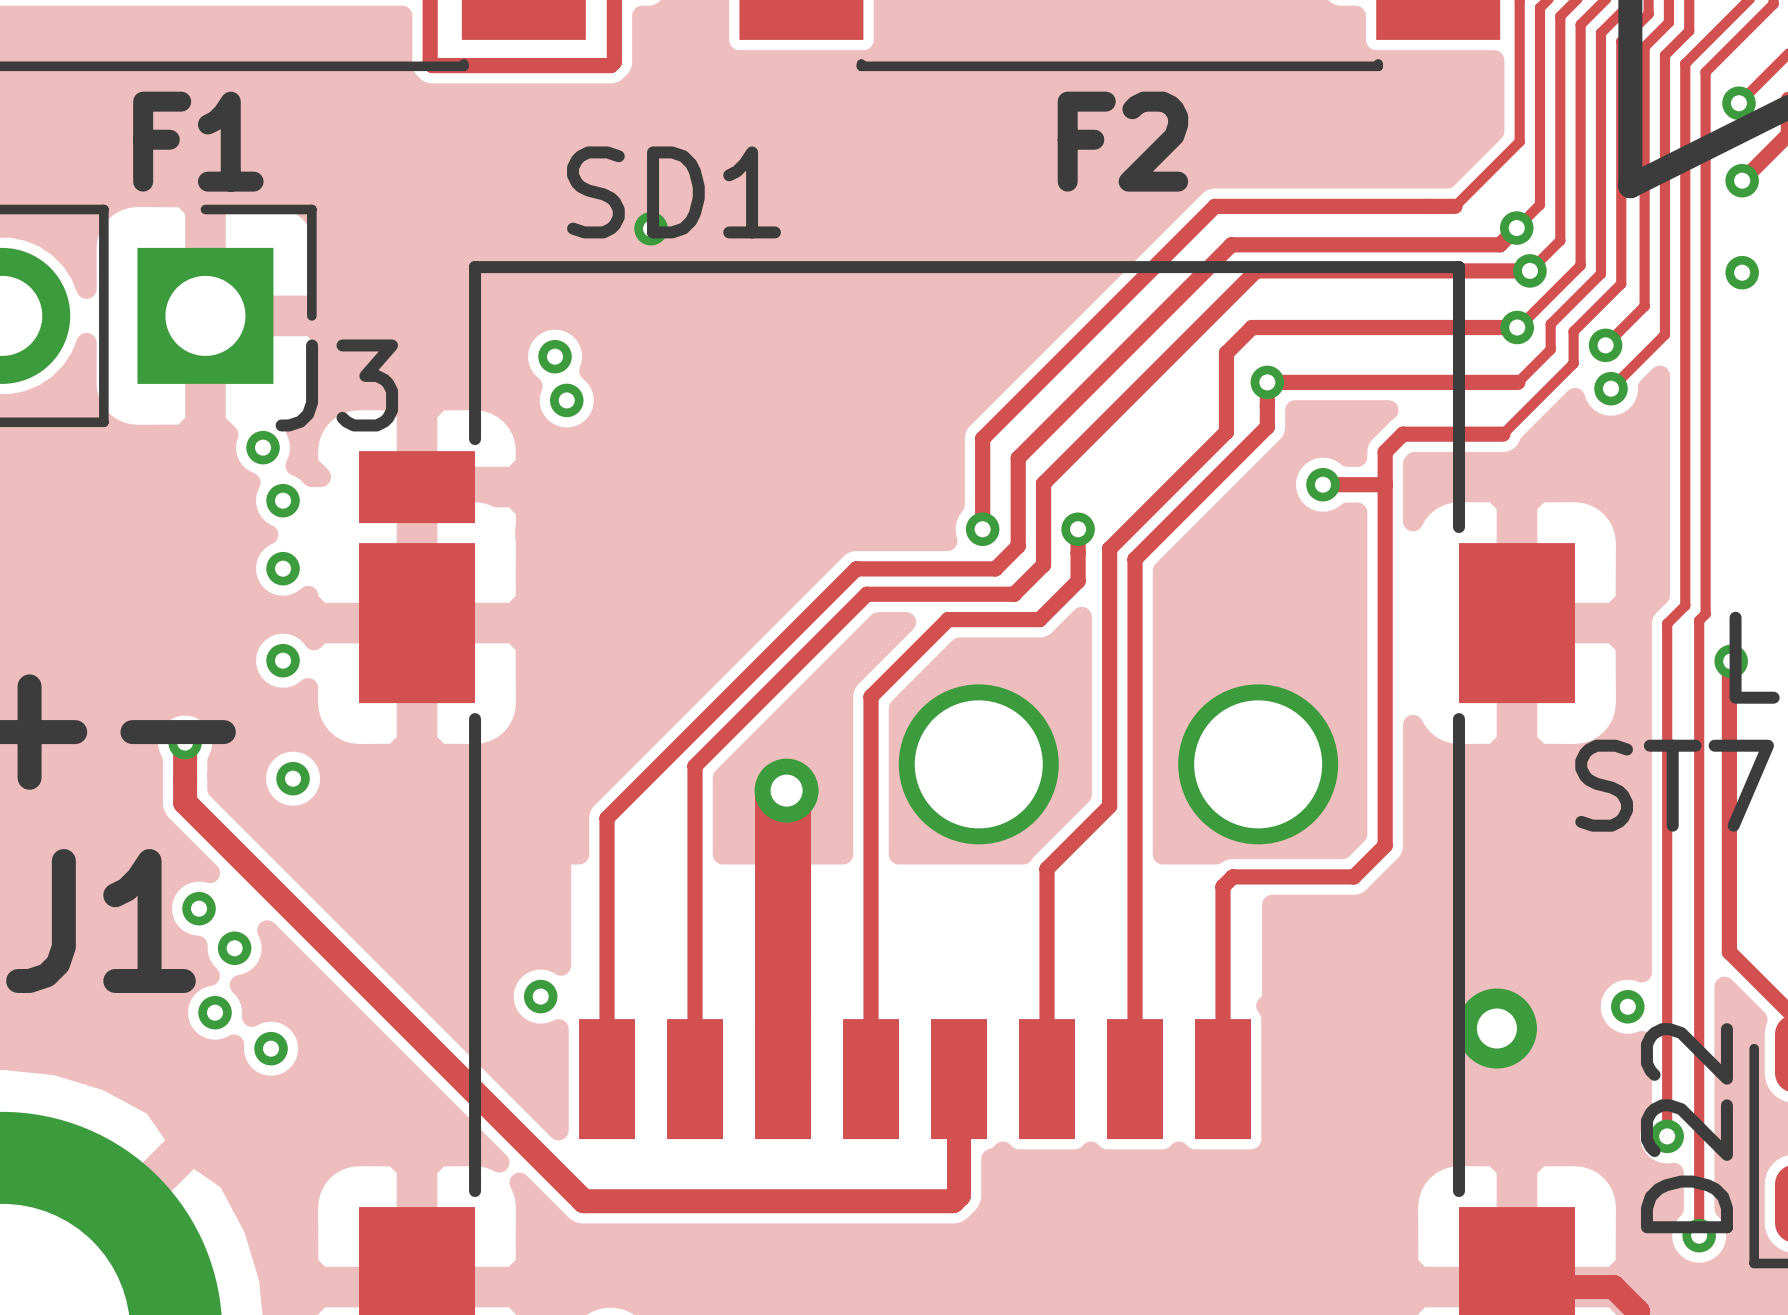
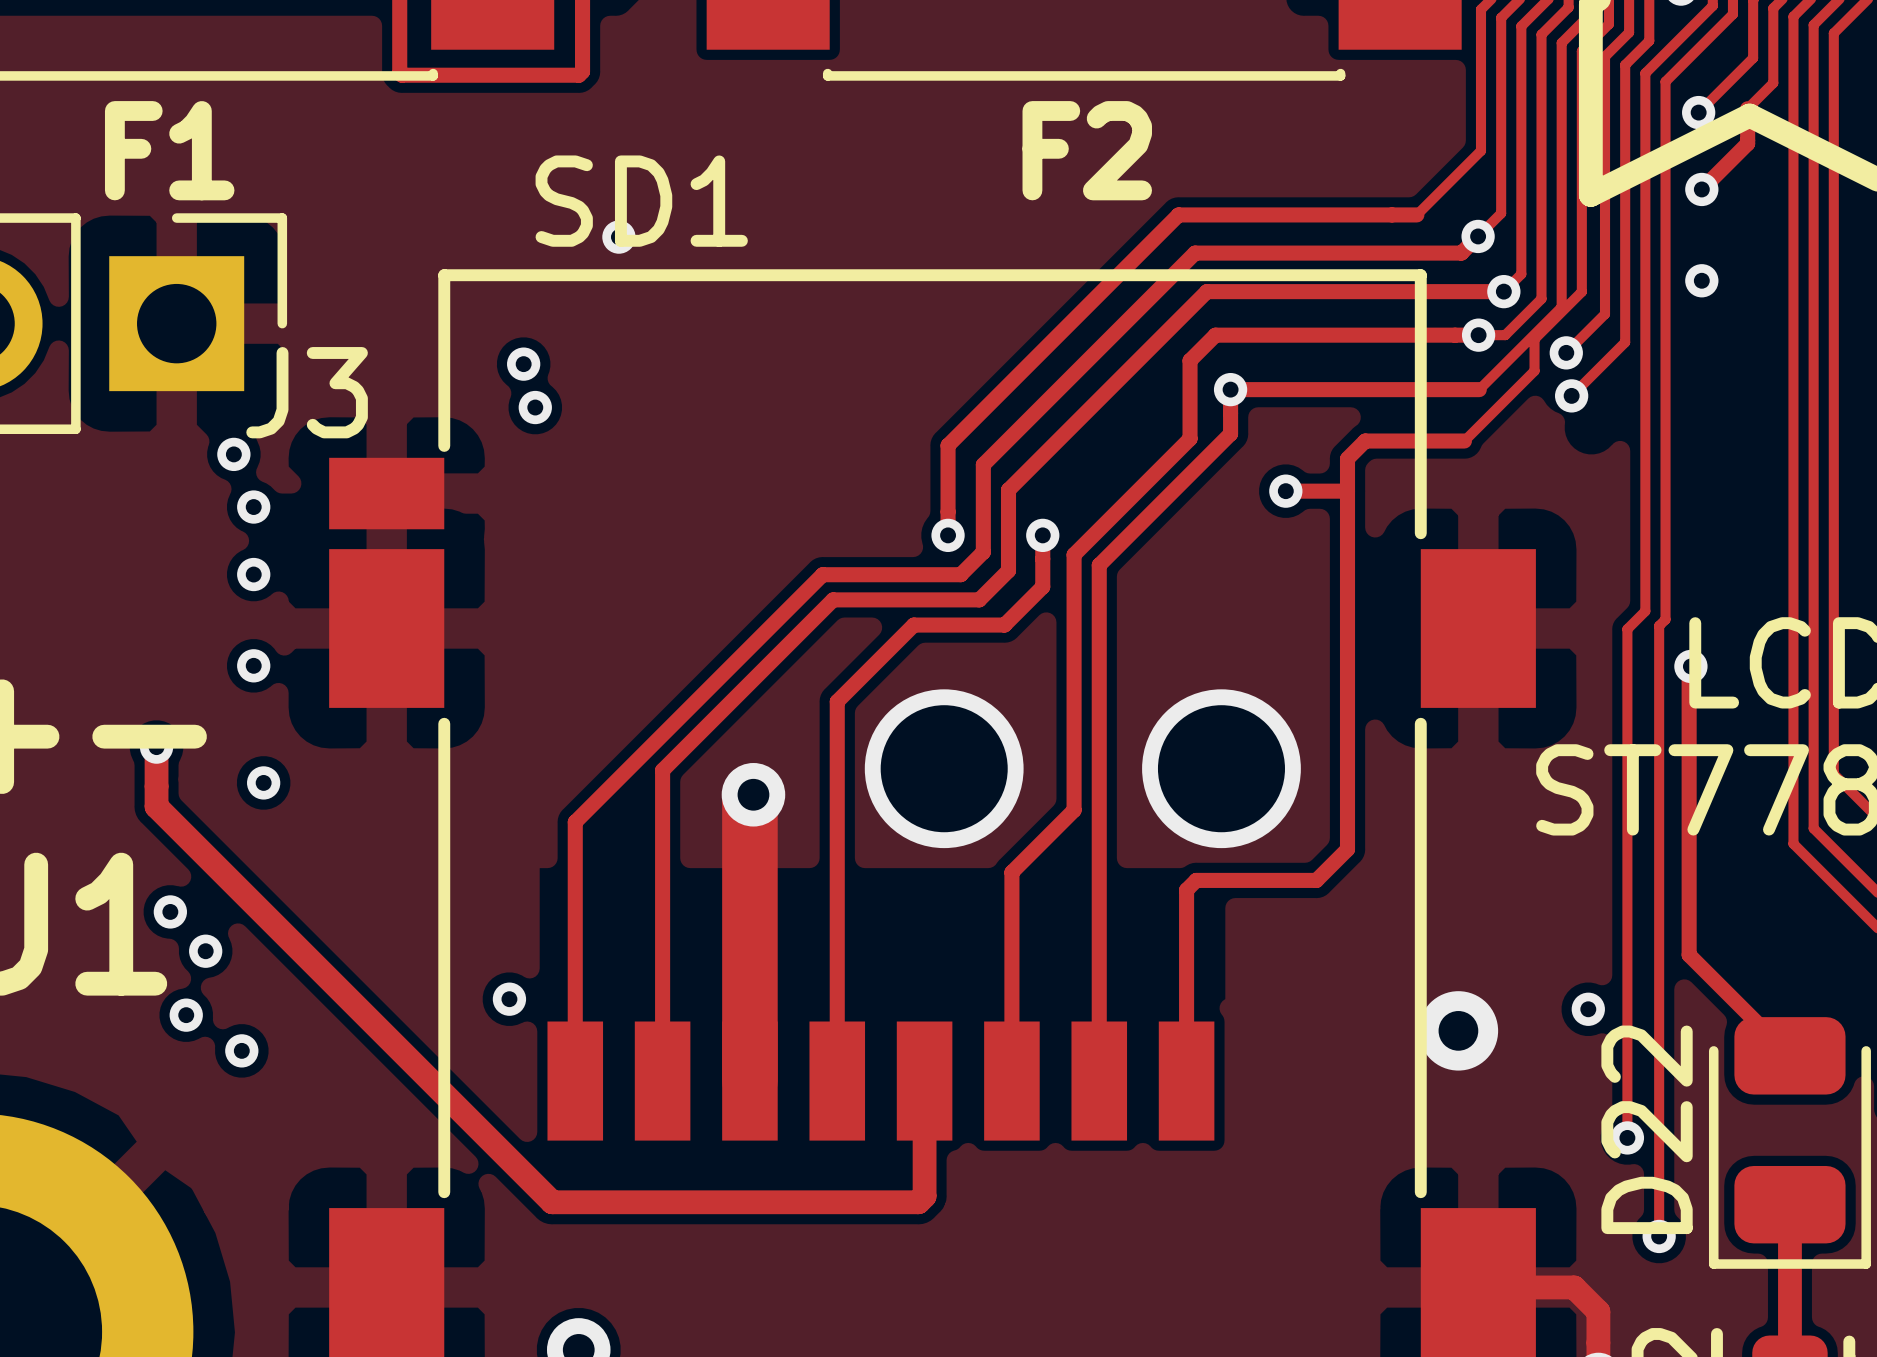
track: (1560, 240) (1529, 270) (1256, 270) (1243, 283) -> (1521, 248) (1521, 274) (1503, 291) (1206, 291)
track: (1580, 265) (1518, 327) -> (1541, 273) (1541, 298) (1505, 335) (1479, 335)
via position: (1529, 270) -> (1503, 291)
track: (1600, 273) (1550, 324) (1550, 349) -> (1561, 281) (1561, 307) (1511, 357)

